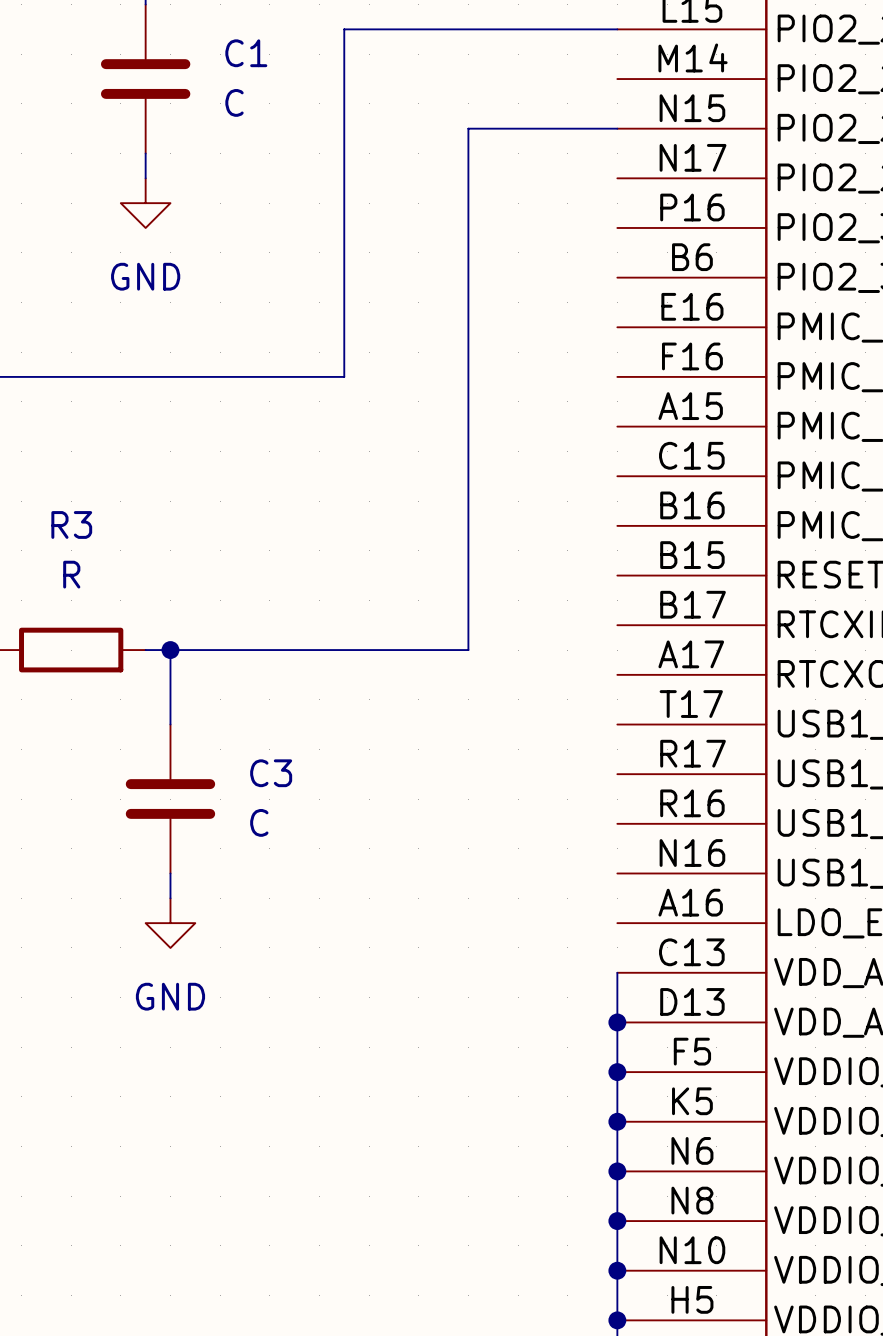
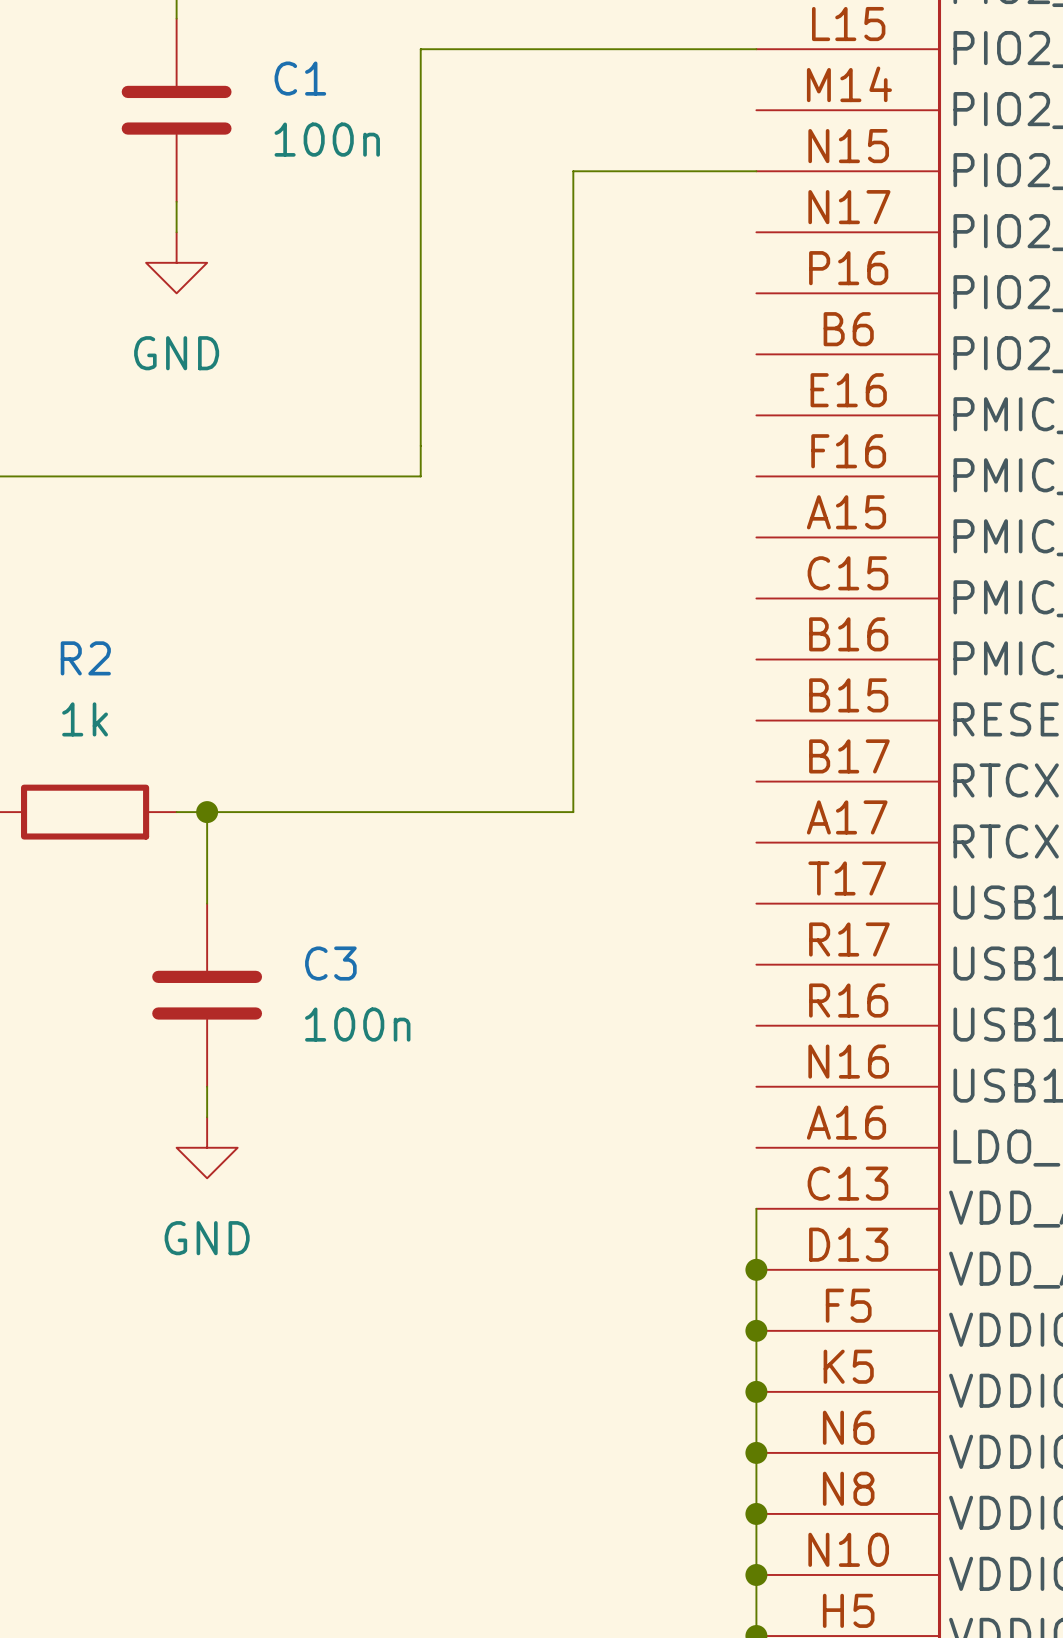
C1 value: C (234, 102) -> 100n (327, 139)
R3 name: R3 (71, 524) -> R2 (85, 658)
R3 value: R (71, 574) -> 1k (85, 719)
C3 value: C (259, 822) -> 100n (357, 1024)

